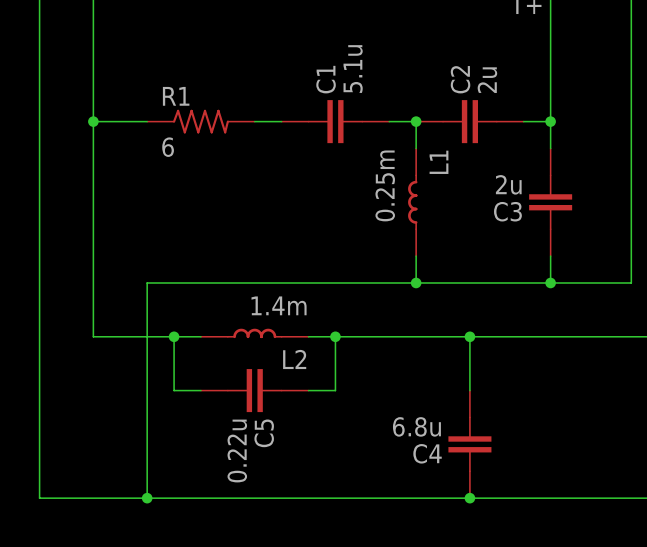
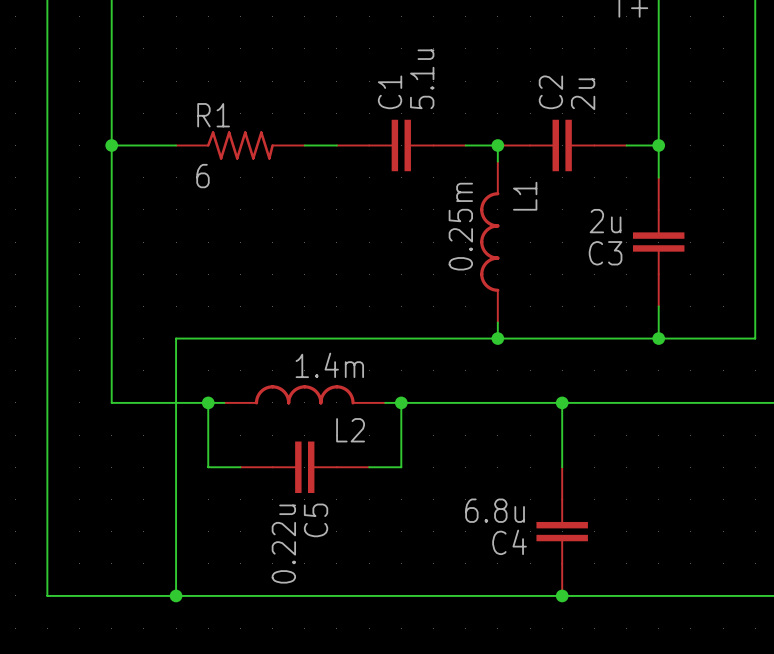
L1 symbol: [408, 148, 418, 257] -> [480, 161, 500, 323]
L2 symbol: [200, 328, 309, 339] -> [224, 385, 386, 405]

